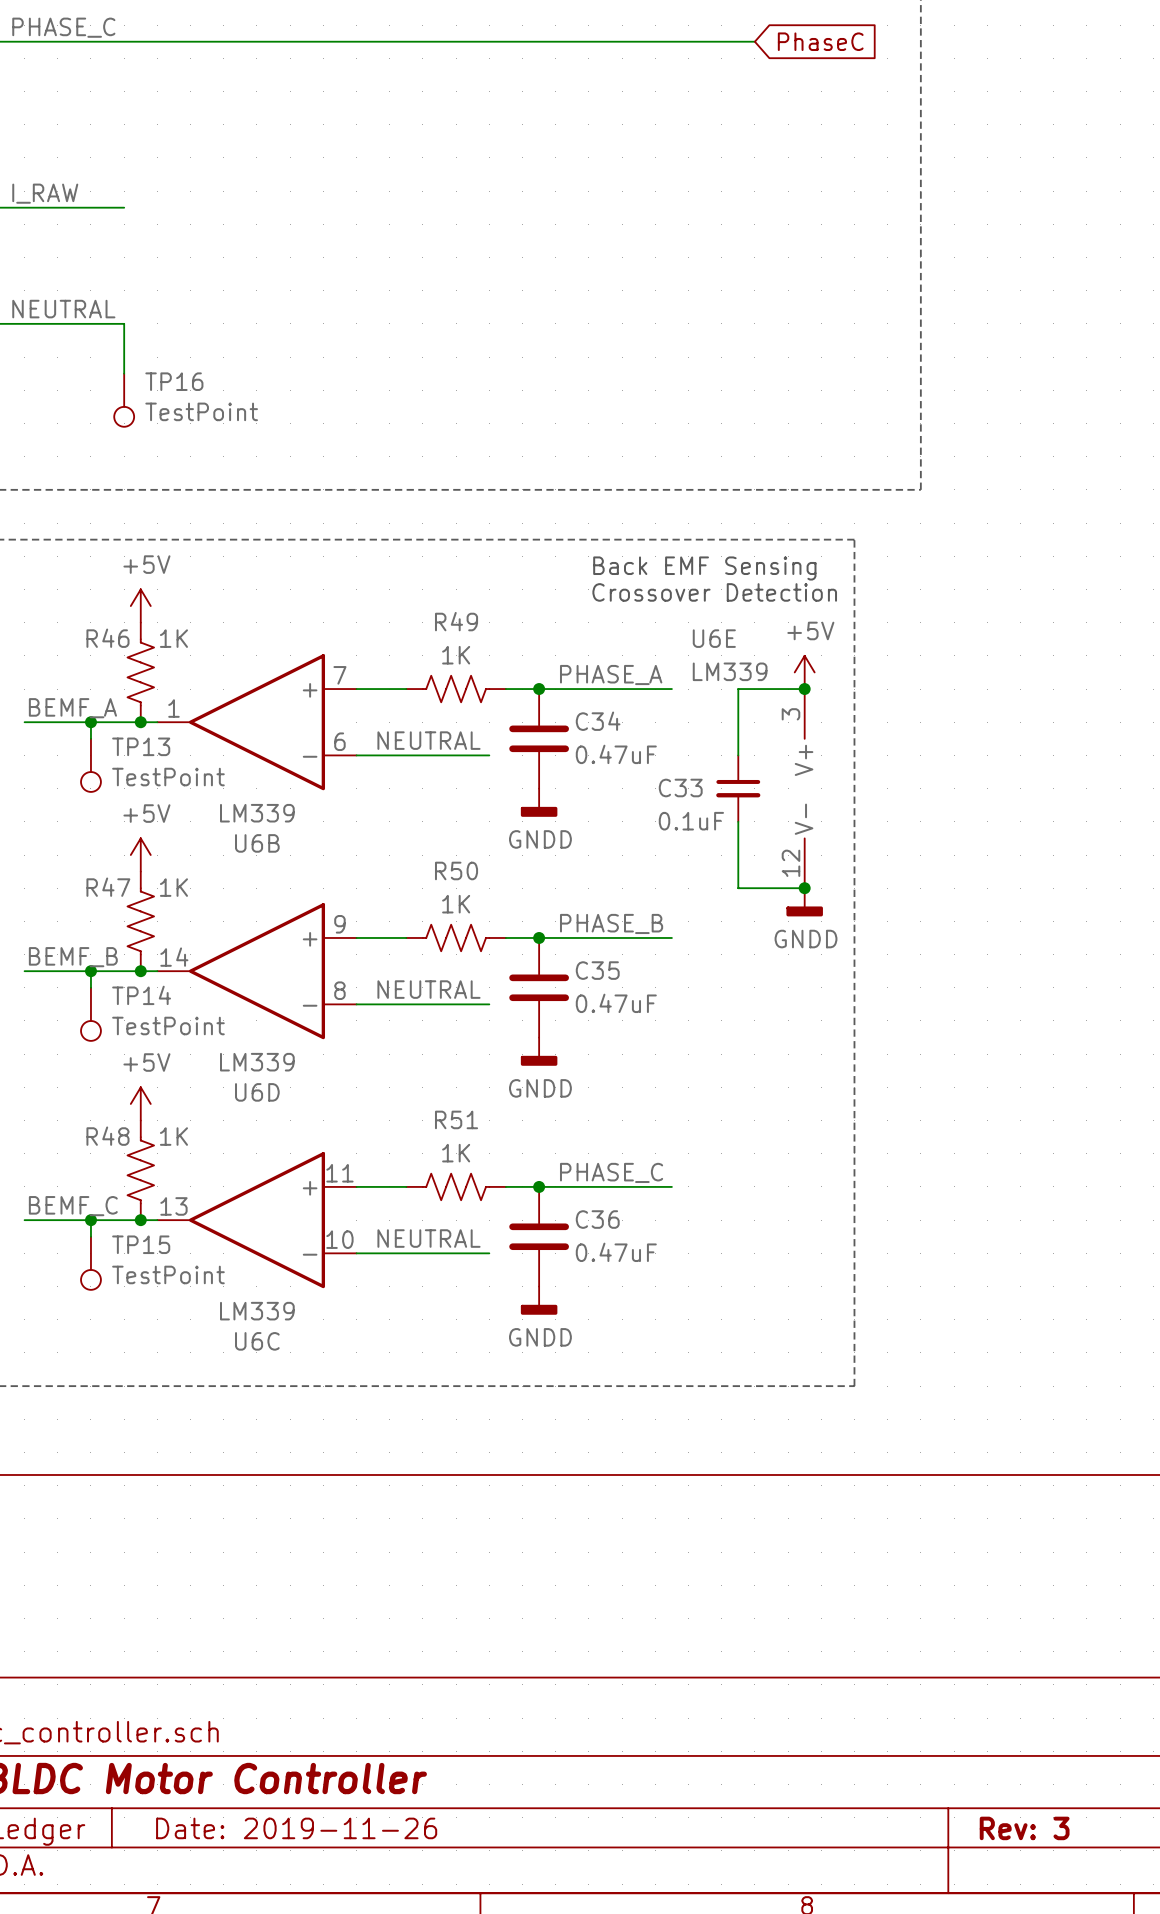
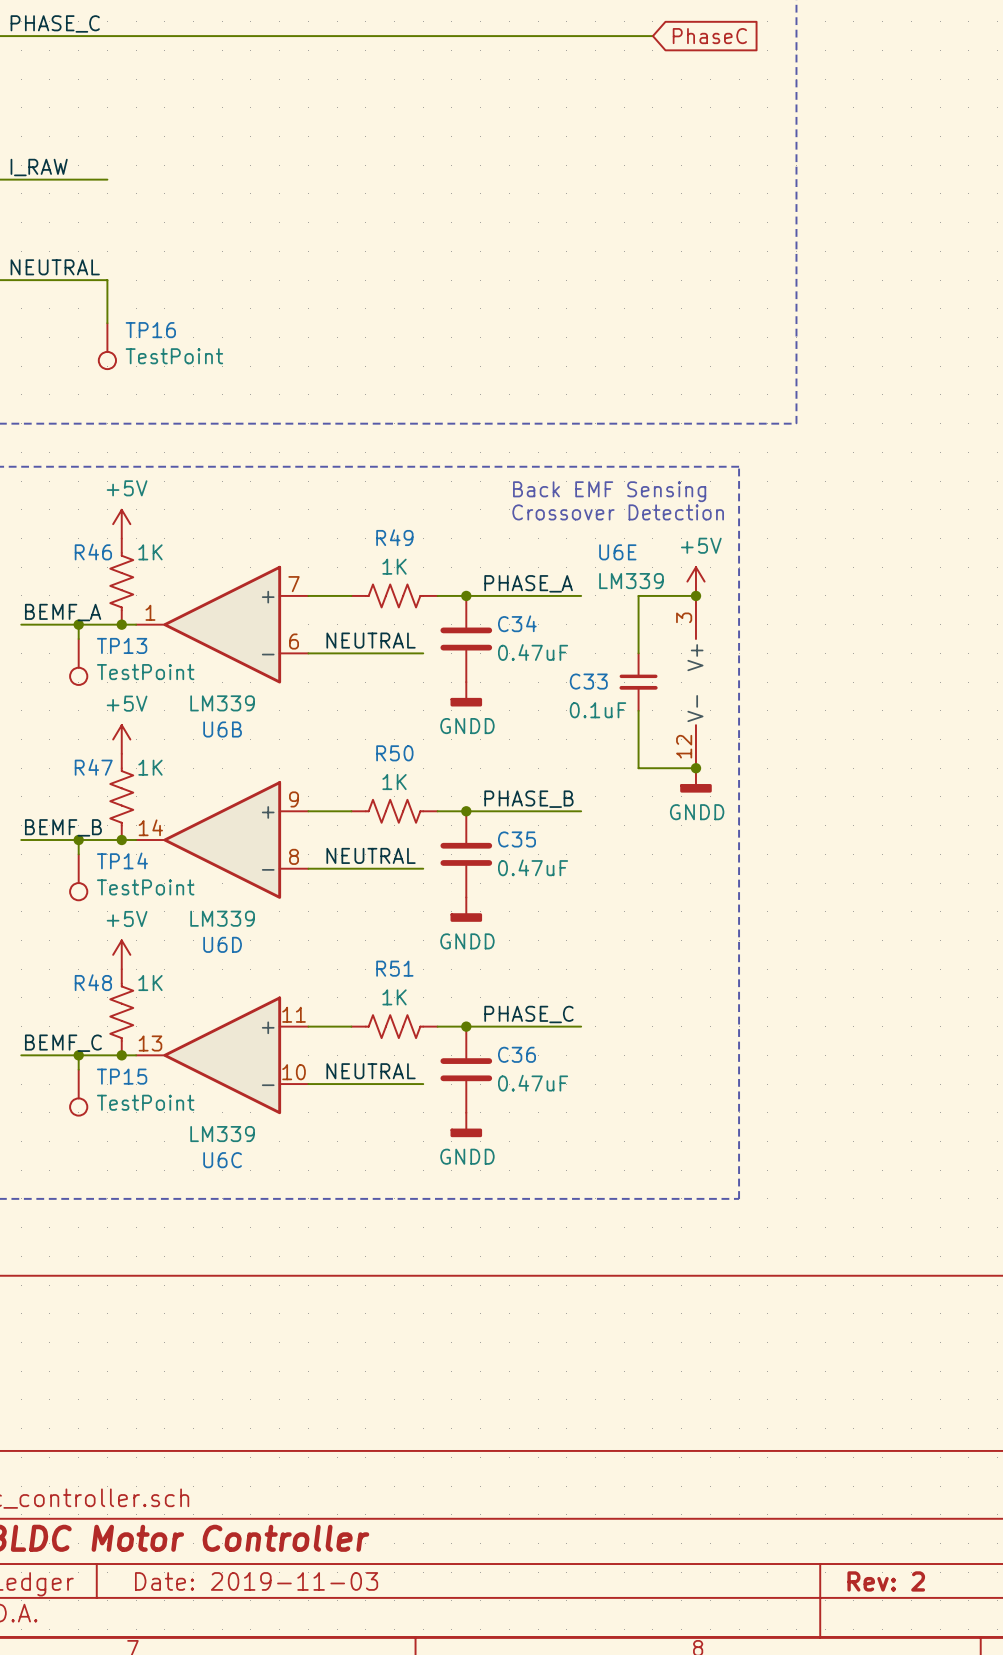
title block: Date: 2019-11-26 (296, 1828) -> Date: 2019-11-03 (256, 1581)
title block: Rev: 3 (1024, 1828) -> Rev: 2 (886, 1581)

